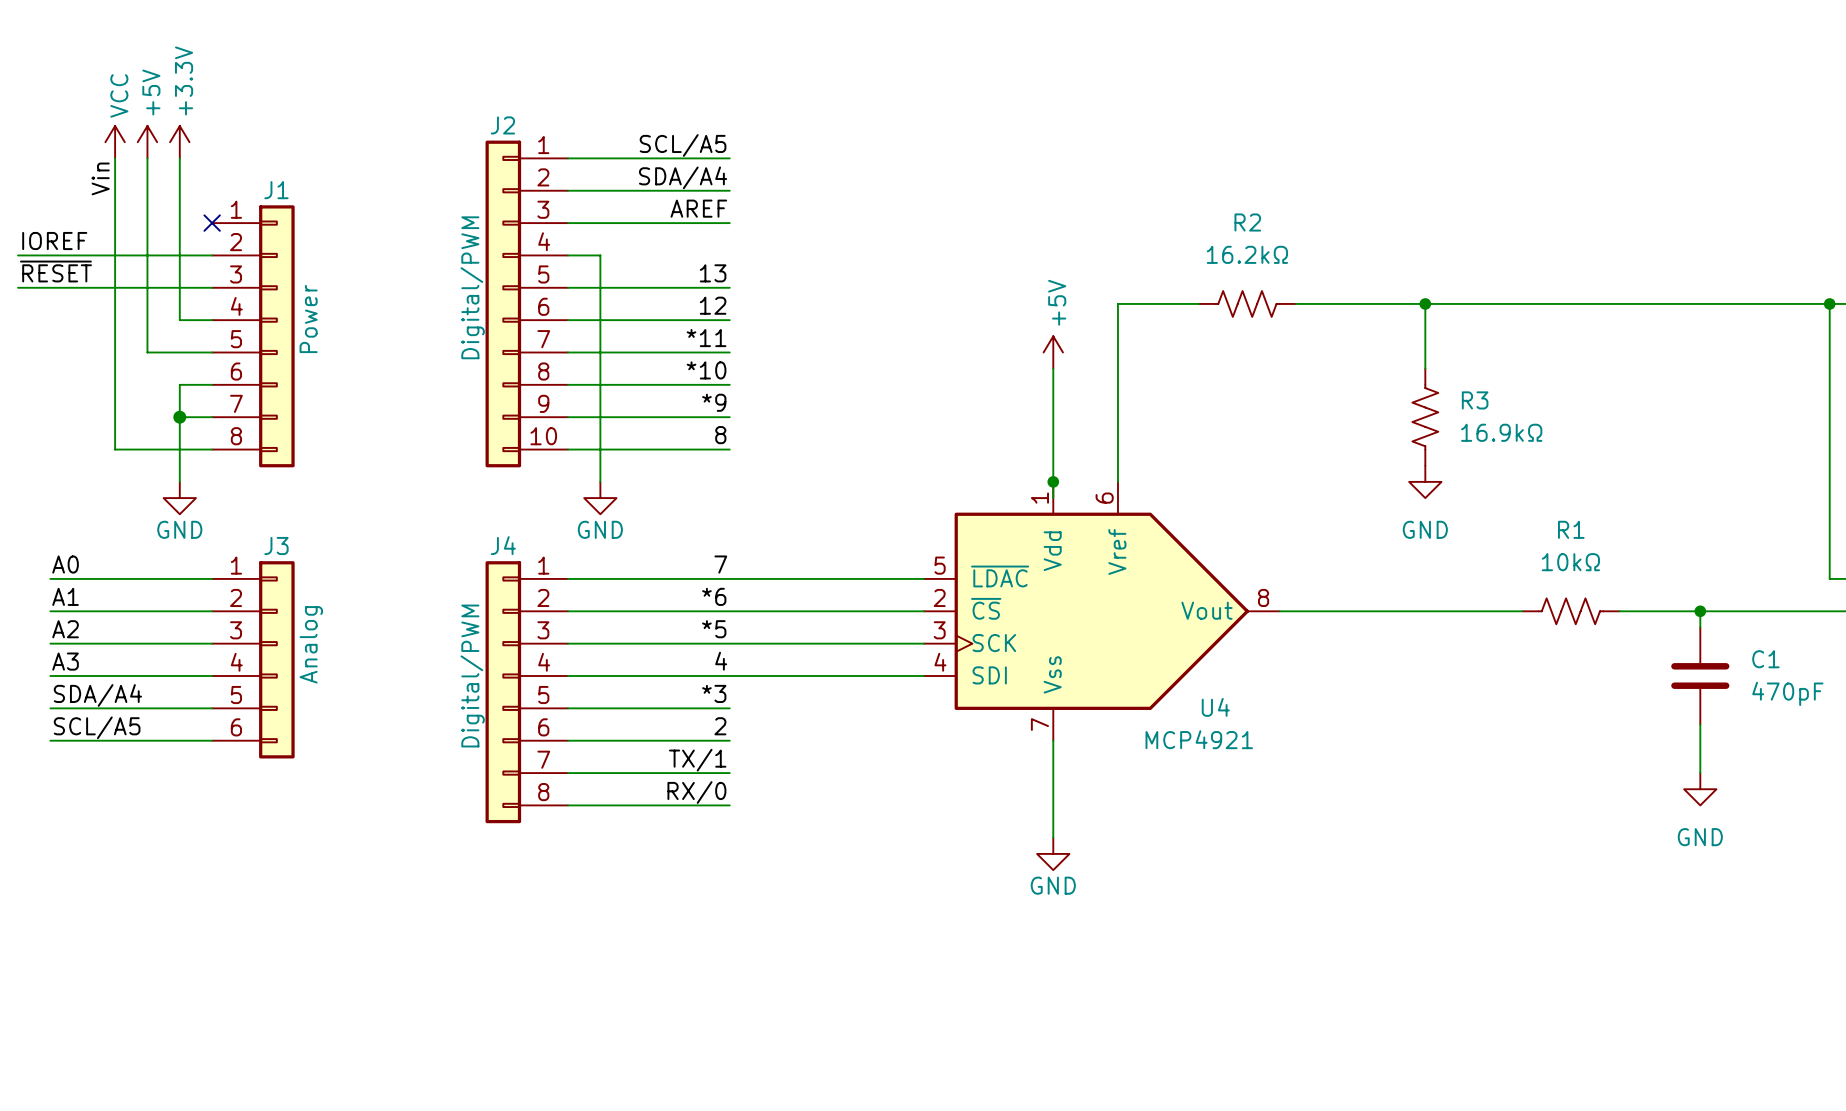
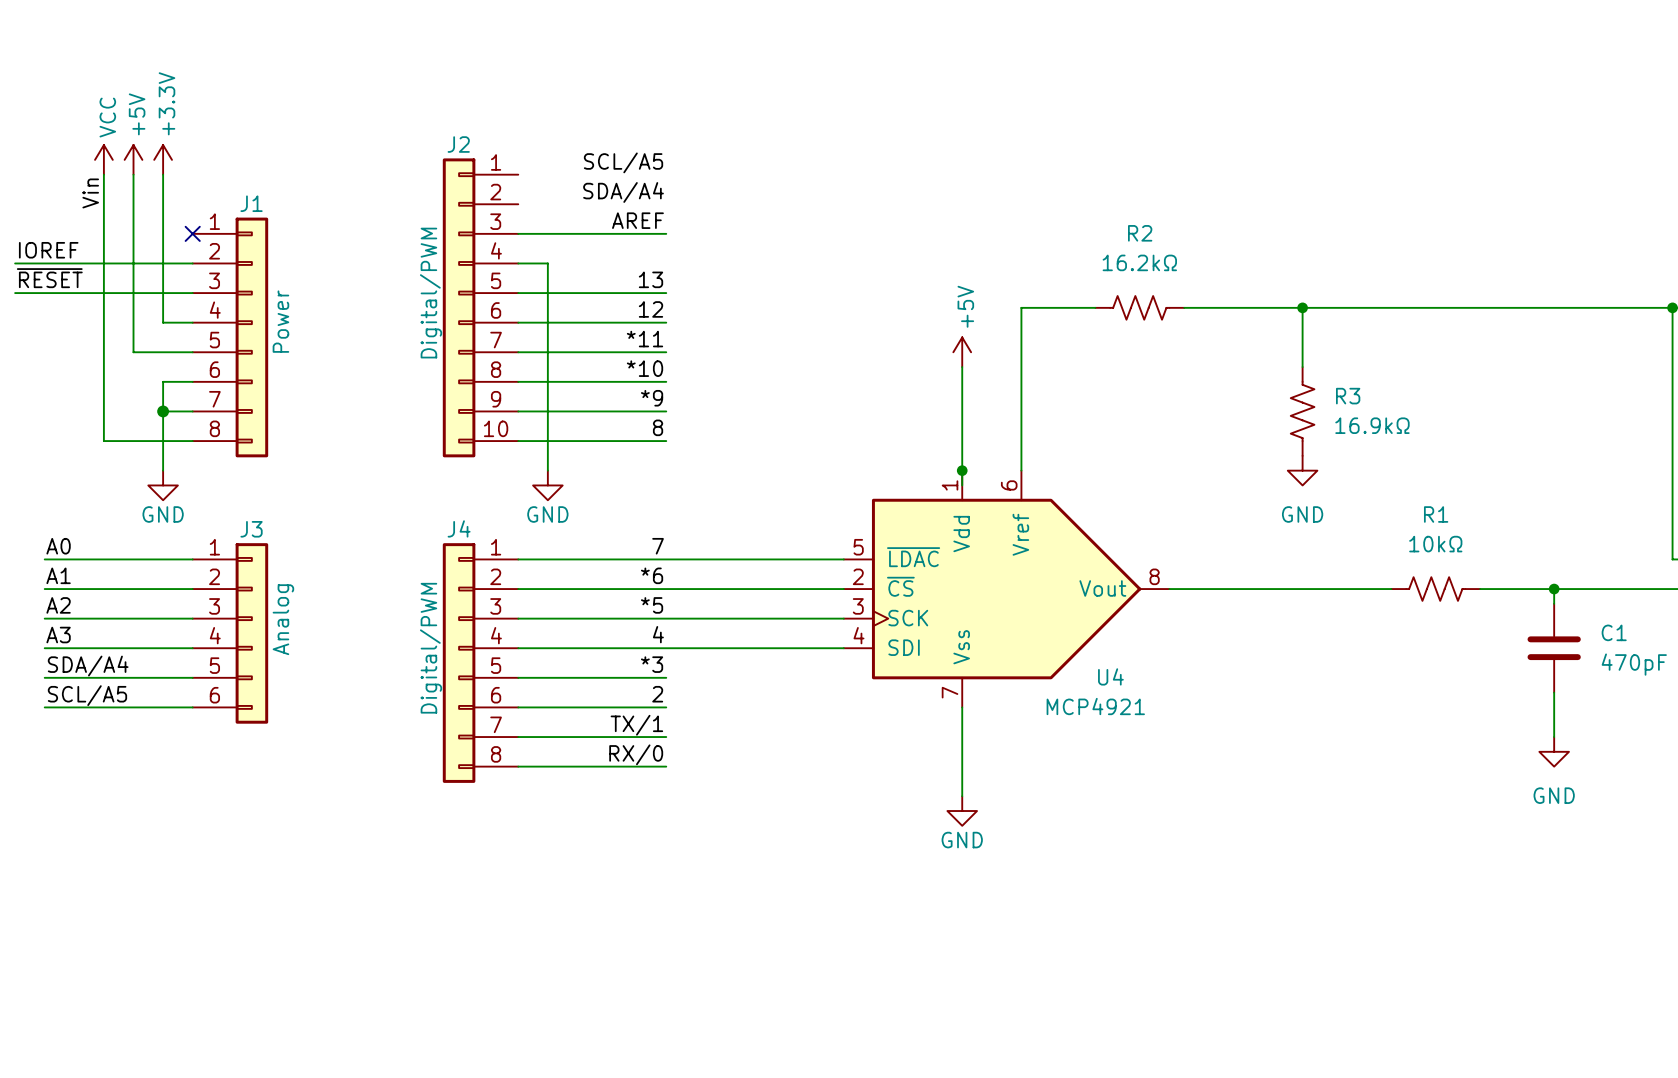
wire: (568, 158) (729, 158) -> none
wire: (568, 190) (729, 190) -> none

